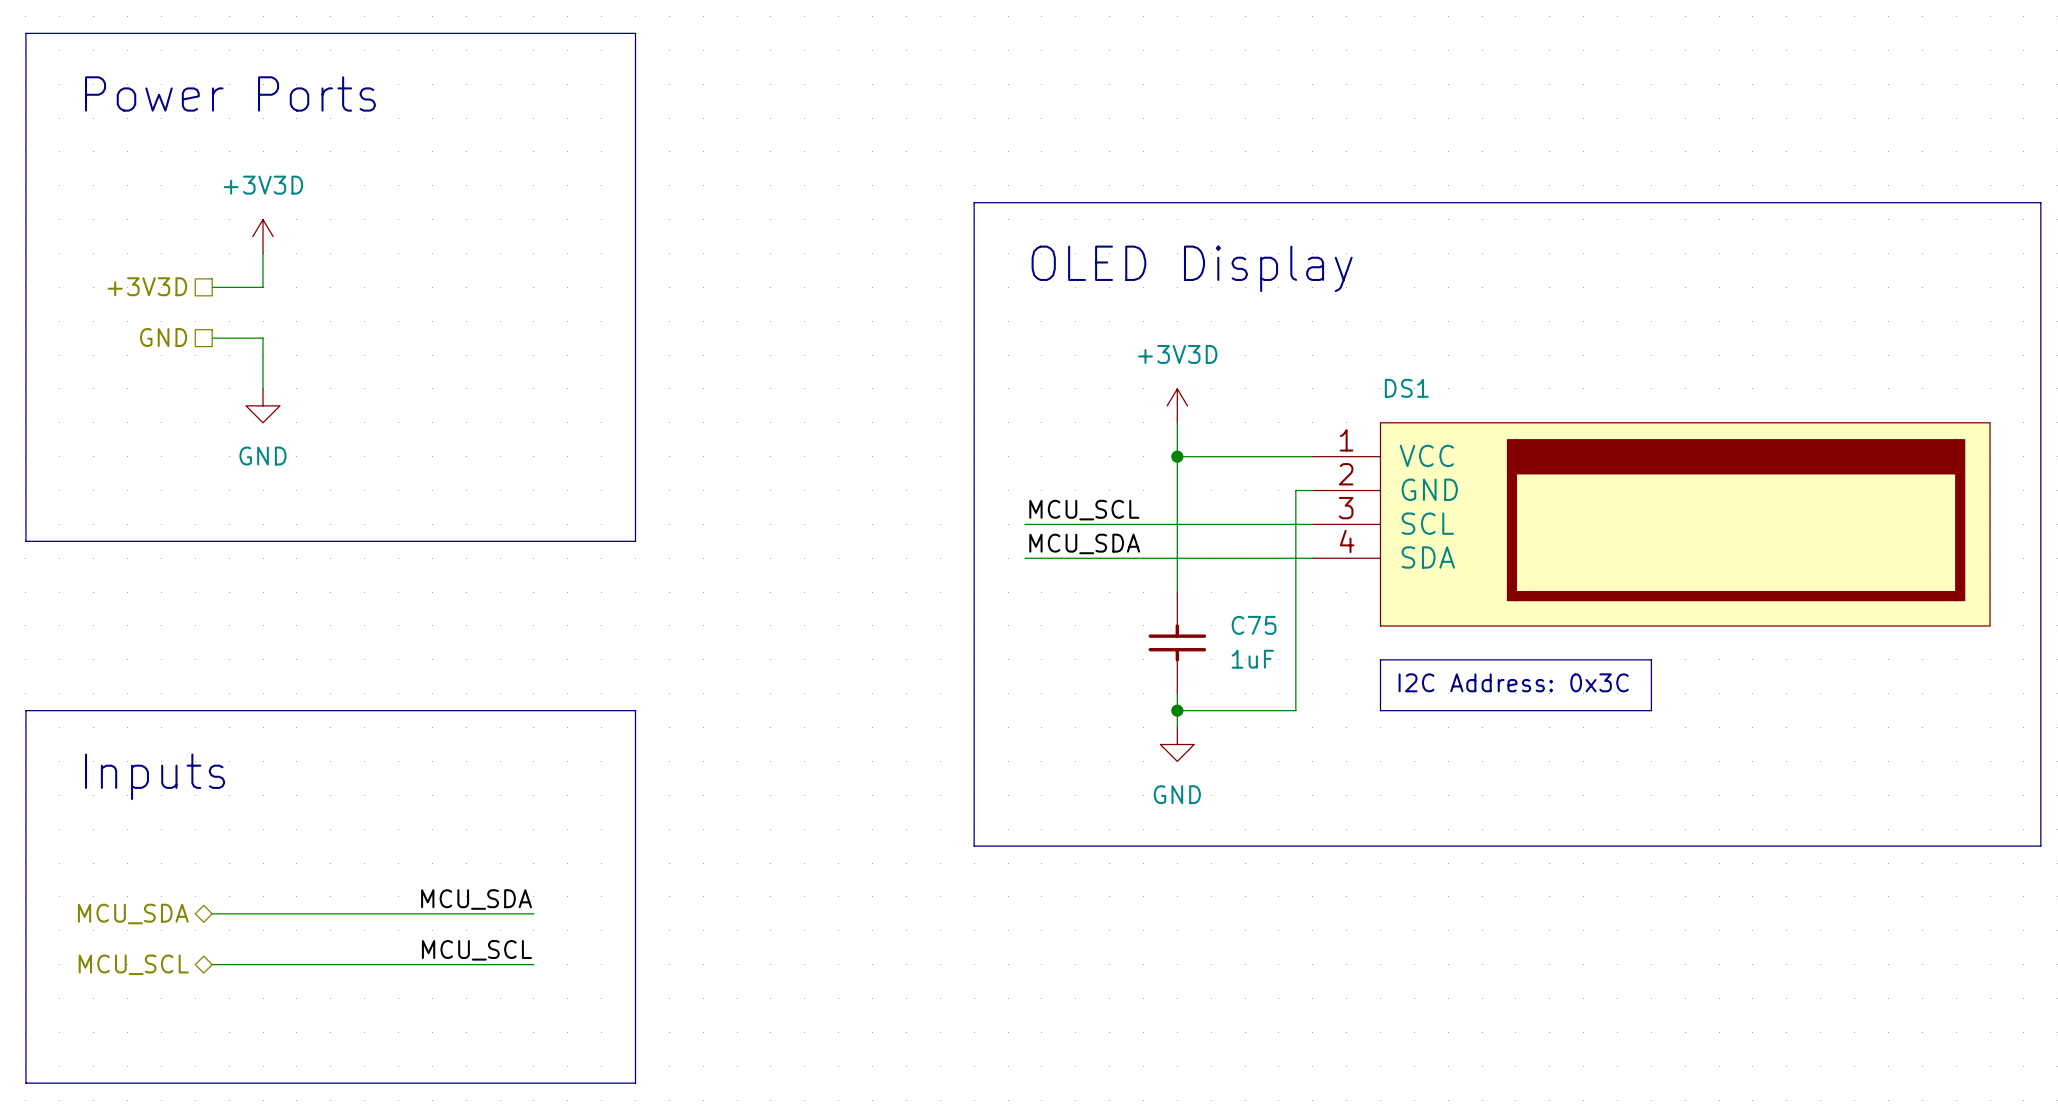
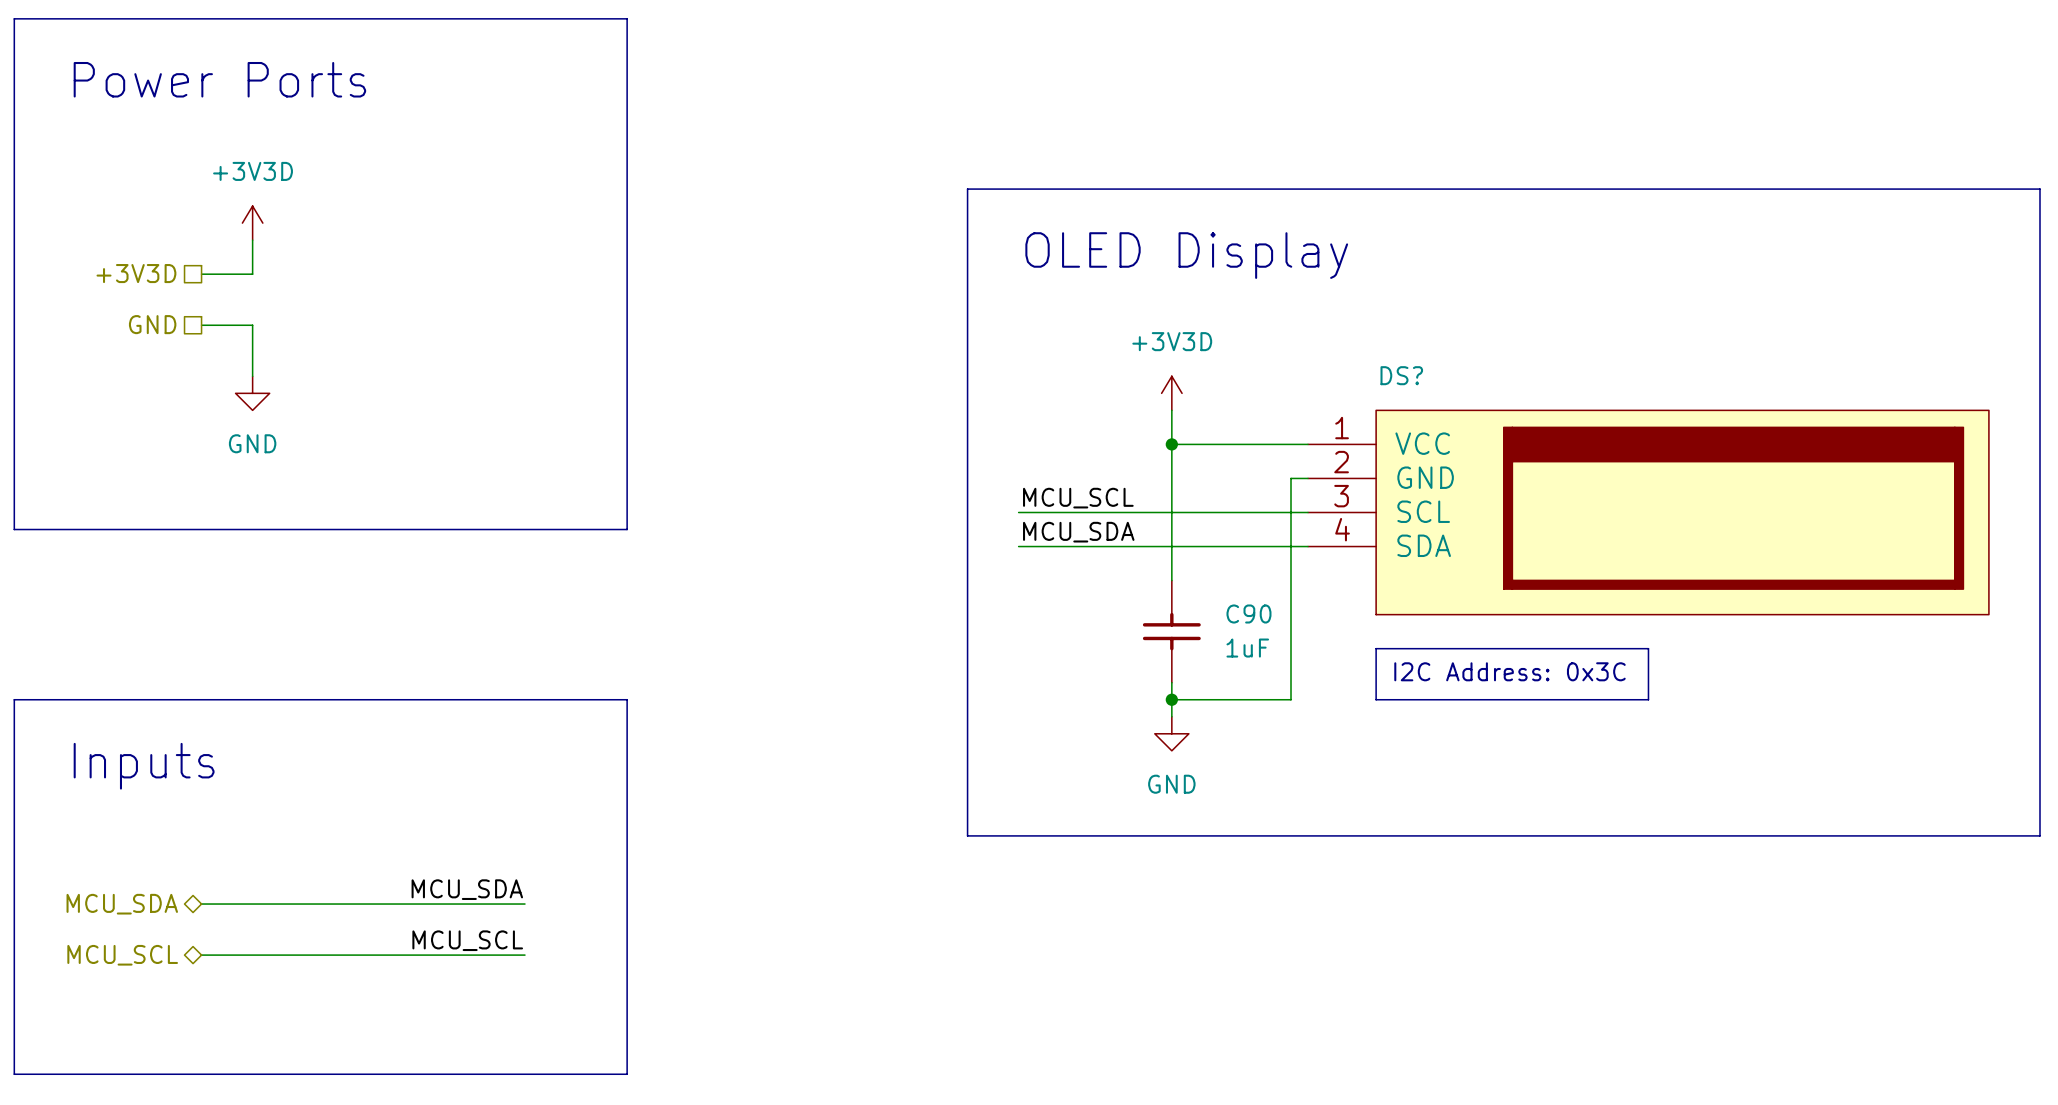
DS1 name: DS1 (1406, 388) -> DS? (1401, 375)
C75 name: C75 (1254, 625) -> C90 (1248, 614)

